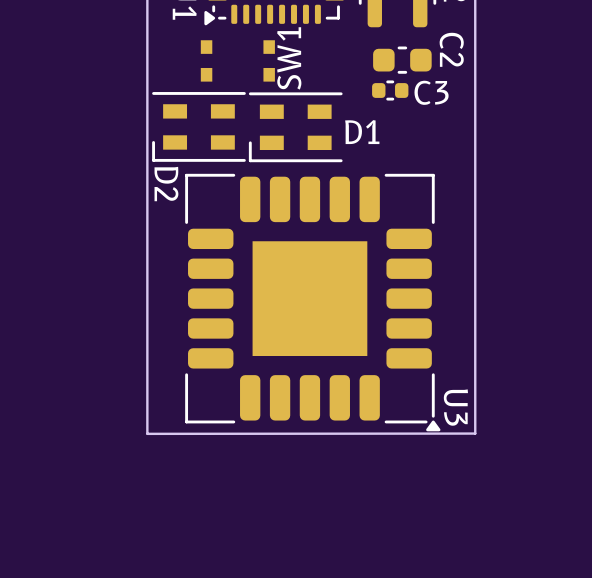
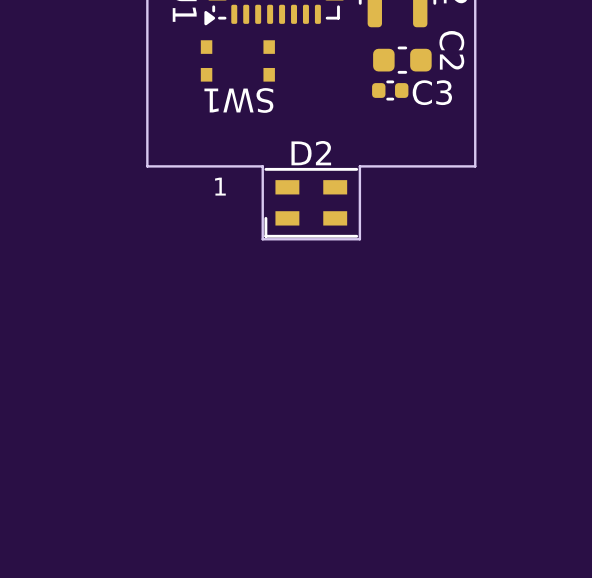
SW1 name rotation: 0° (289, 58) -> 90° counterclockwise (238, 100)
D2 position: (198, 126) -> (311, 202)
D1: (295, 127) -> none
board edge: (147, 166) (147, 433) -> none
board edge: (475, 166) (475, 433) (147, 433) -> (475, 166) (359, 166) (359, 239) (262, 239) (262, 166) (147, 166)
D2 name rotation: 0° (166, 184) -> 90° counterclockwise (311, 153)
D2 name position: D2 (166, 184) -> D2 (311, 153)
D2 text: none -> 1 (220, 186)
U3: (312, 302) -> none

